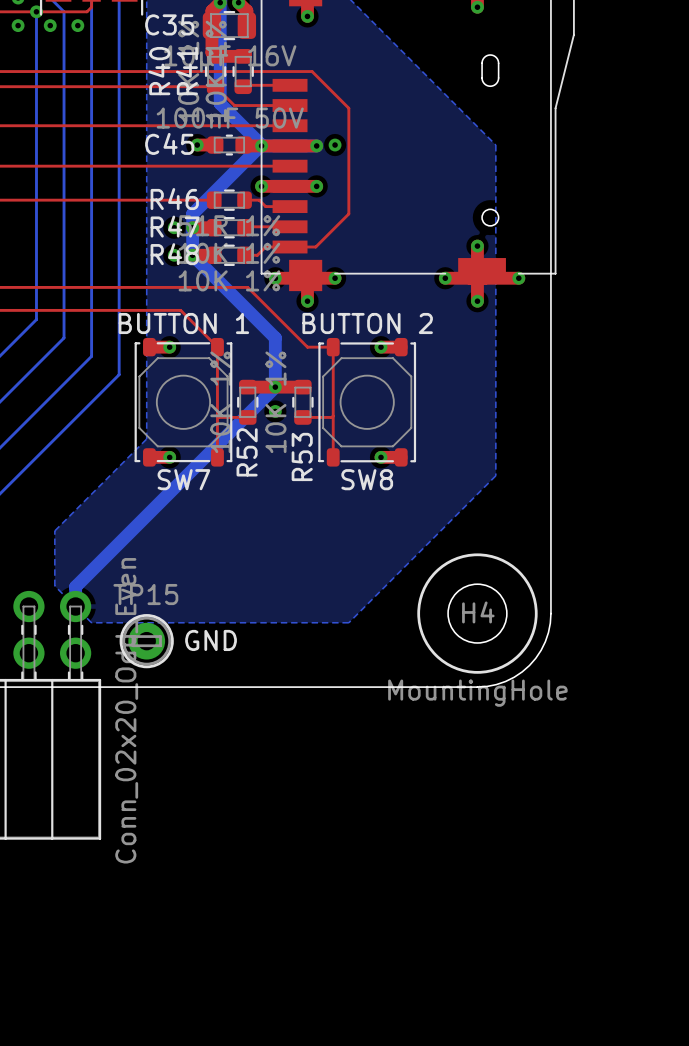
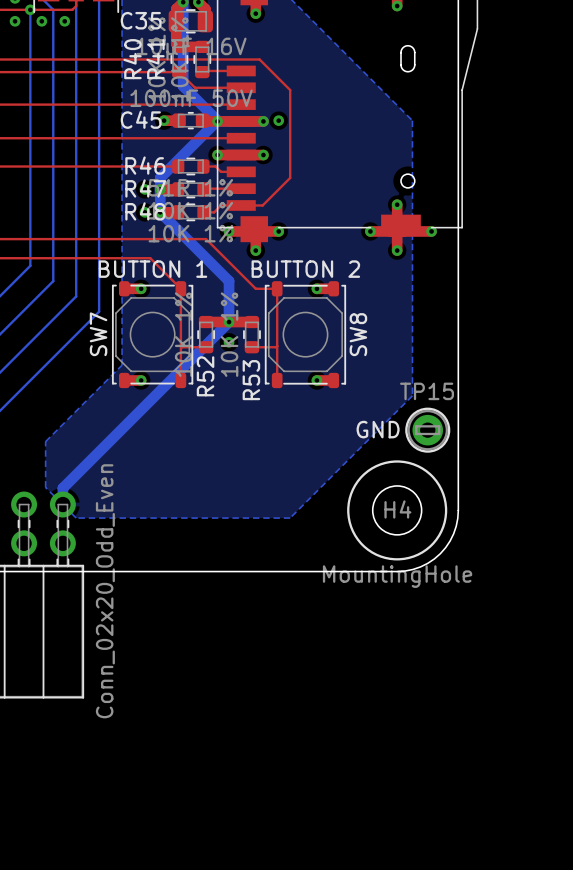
SW7 name rotation: 0° (183, 479) -> 90° counterclockwise (98, 334)
SW7 name position: SW7 (183, 479) -> SW7 (98, 334)
SW8 name rotation: 0° (367, 479) -> 90° counterclockwise (358, 334)
SW8 name position: SW8 (367, 479) -> SW8 (358, 334)
TP15 value position: GND (211, 640) -> GND (378, 429)
TP15 position: (146, 641) -> (427, 430)

